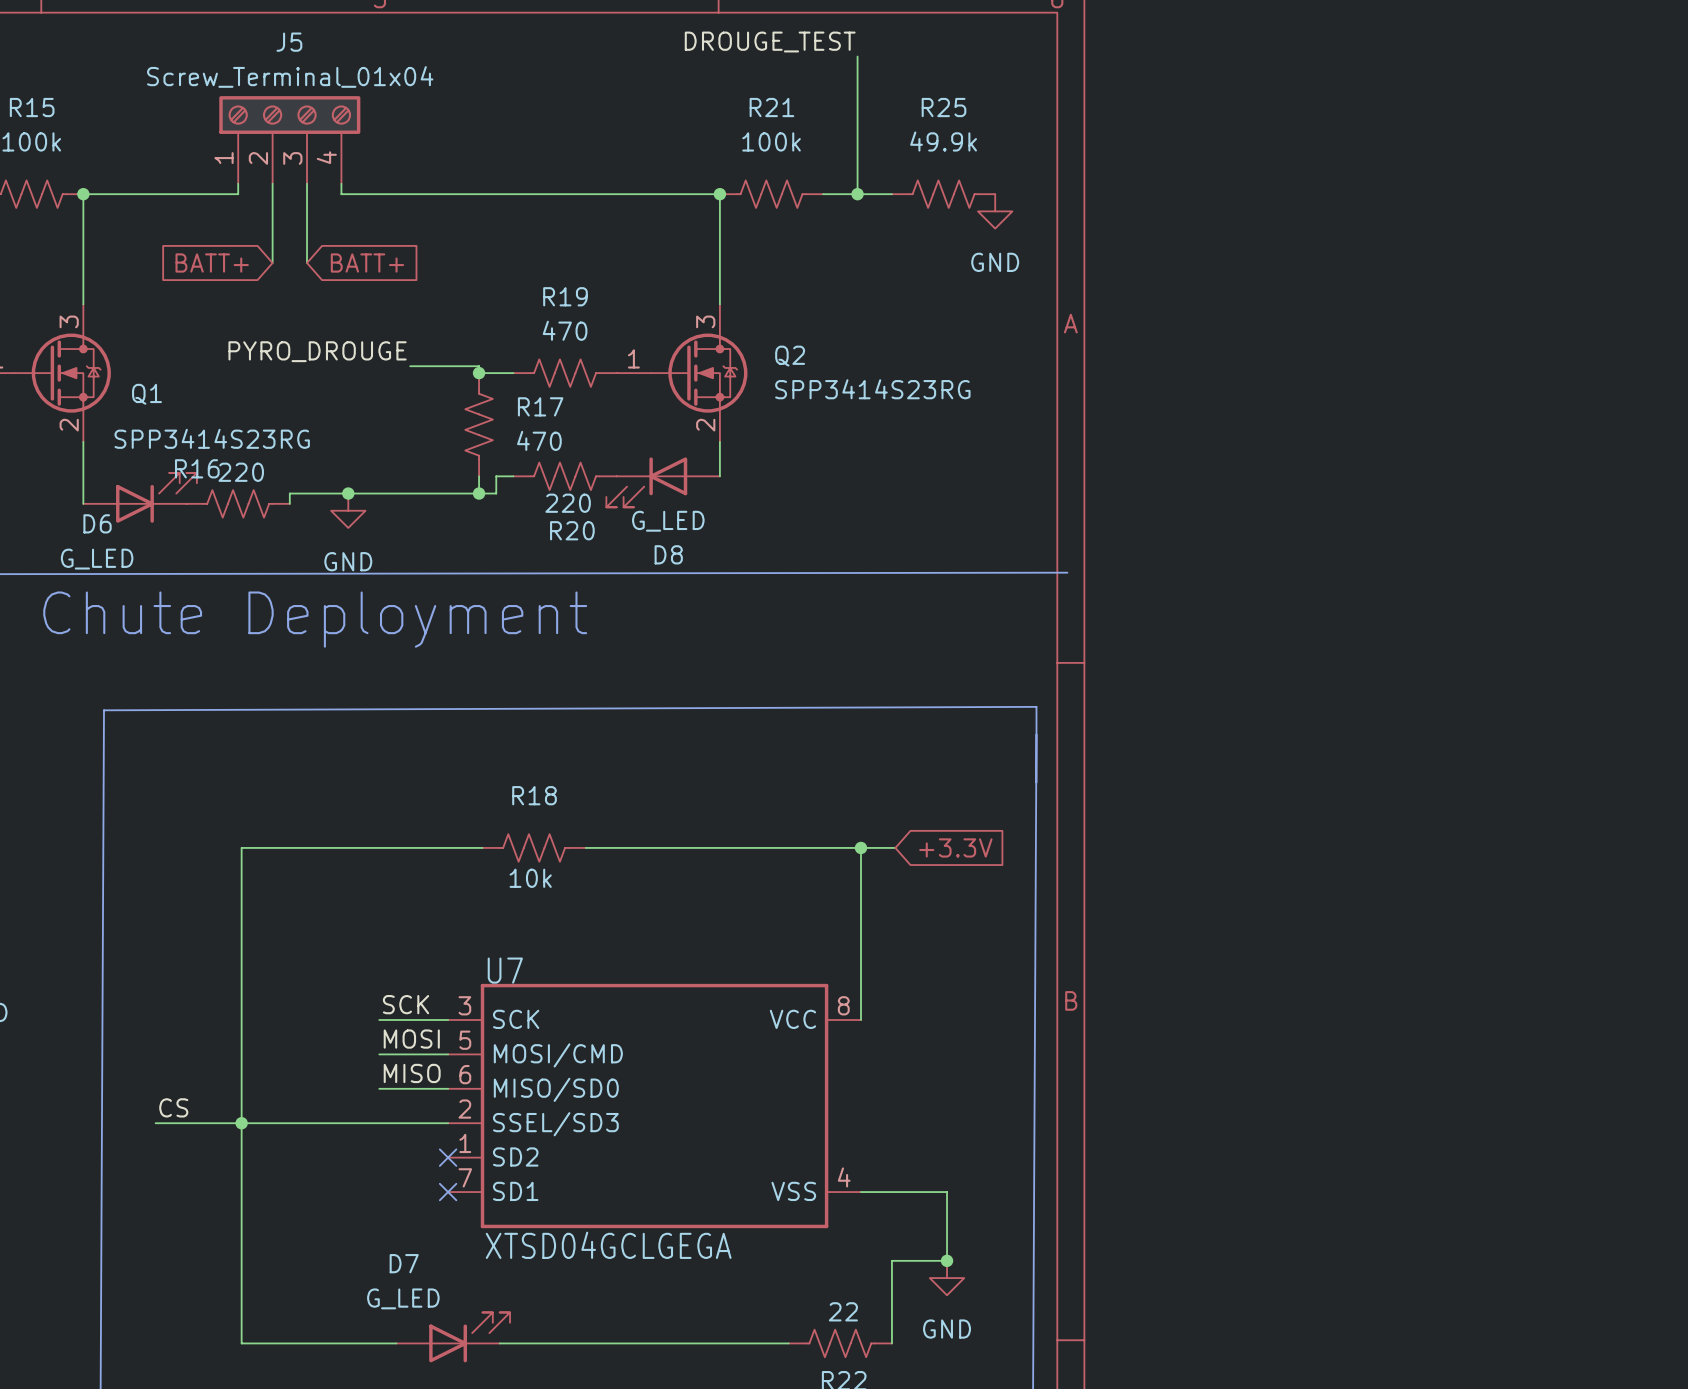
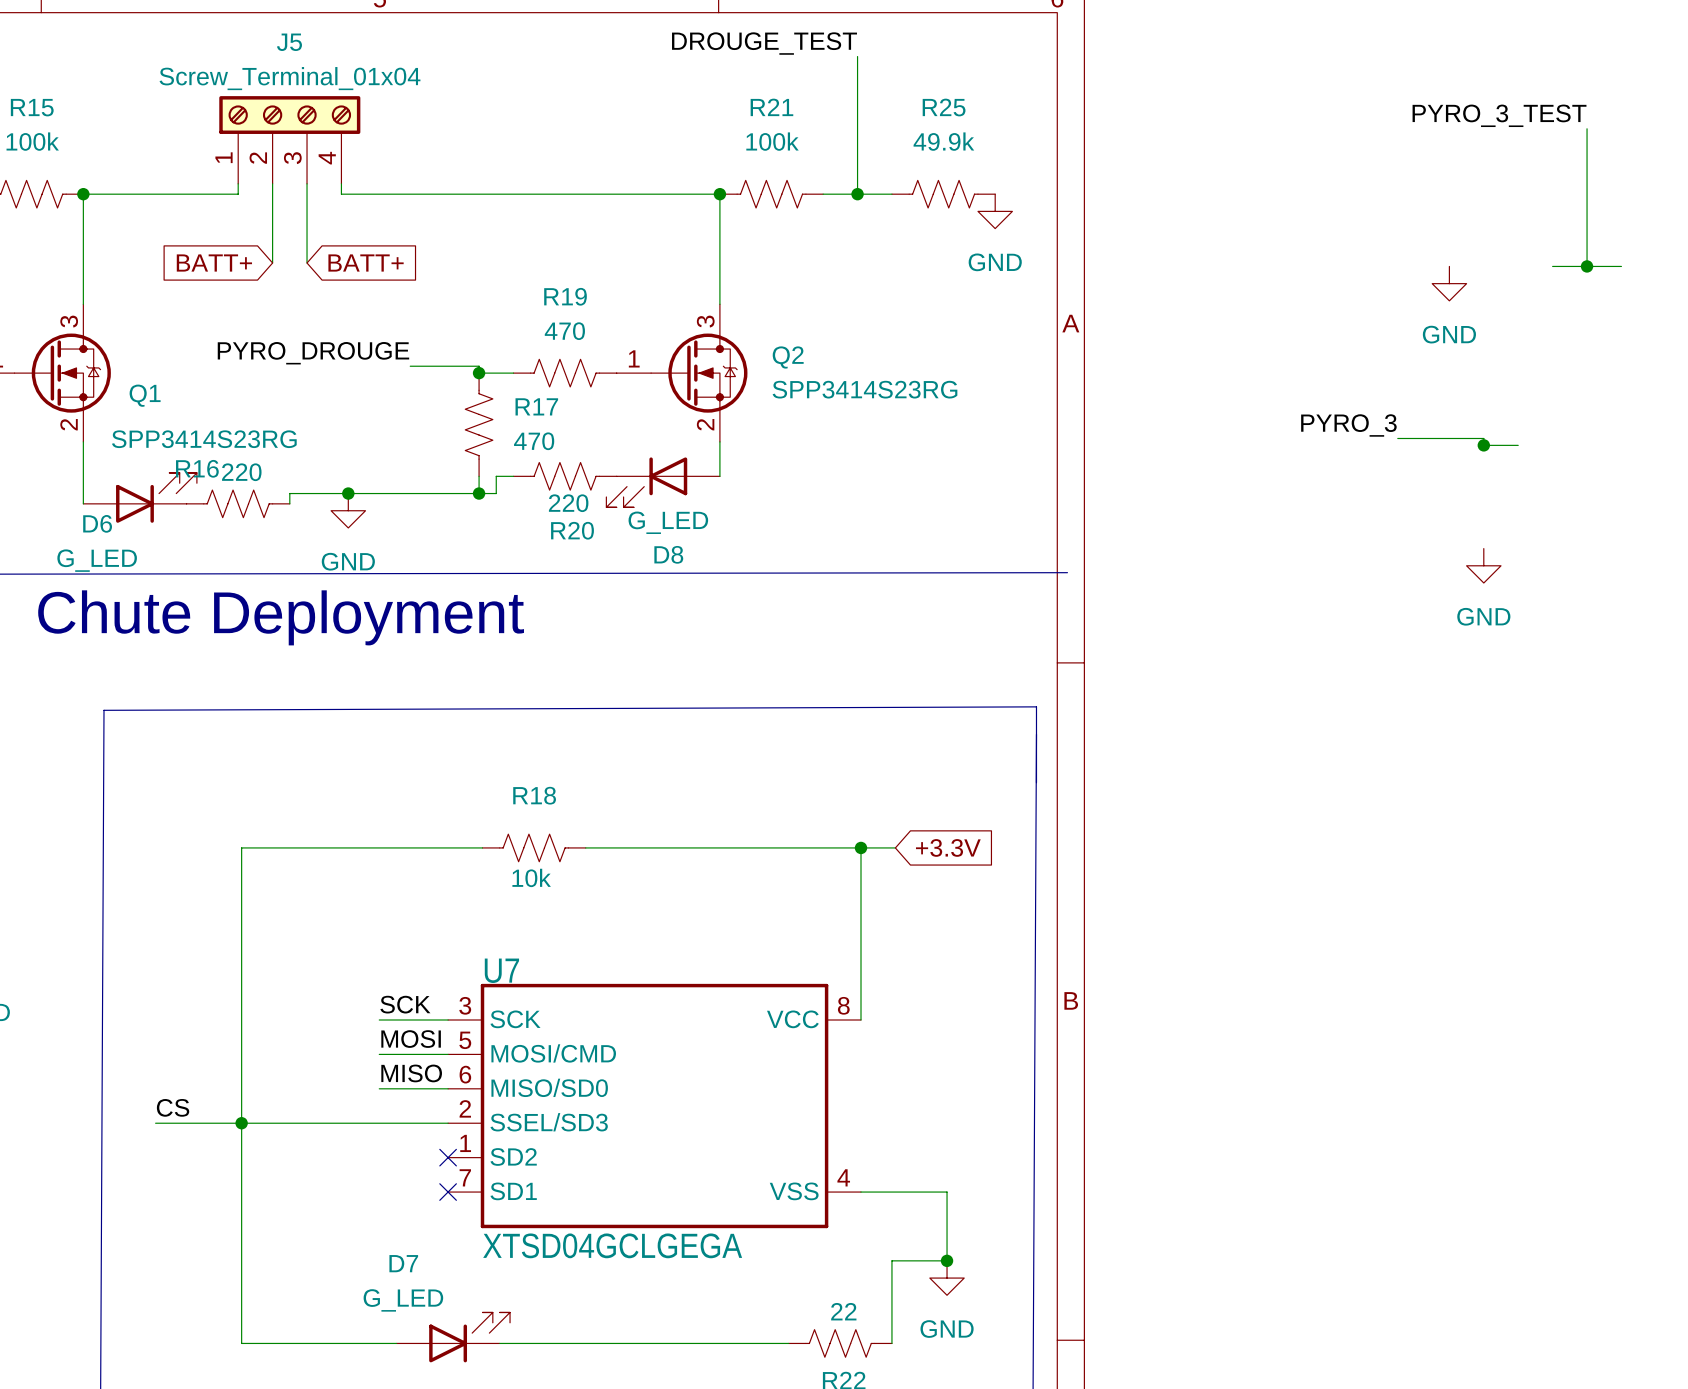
label: none -> PYRO_3_TEST (1499, 115)
wire: none -> (1587, 128) (1587, 266)
wire: none -> (1552, 266) (1621, 266)
junction: none -> (1587, 266)
power symbol: none -> GND (1449, 283)
label: none -> PYRO_3 (1348, 425)
wire: none -> (1397, 438) (1483, 438) (1483, 445) (1518, 445)
junction: none -> (1483, 445)
power symbol: none -> GND (1483, 565)

